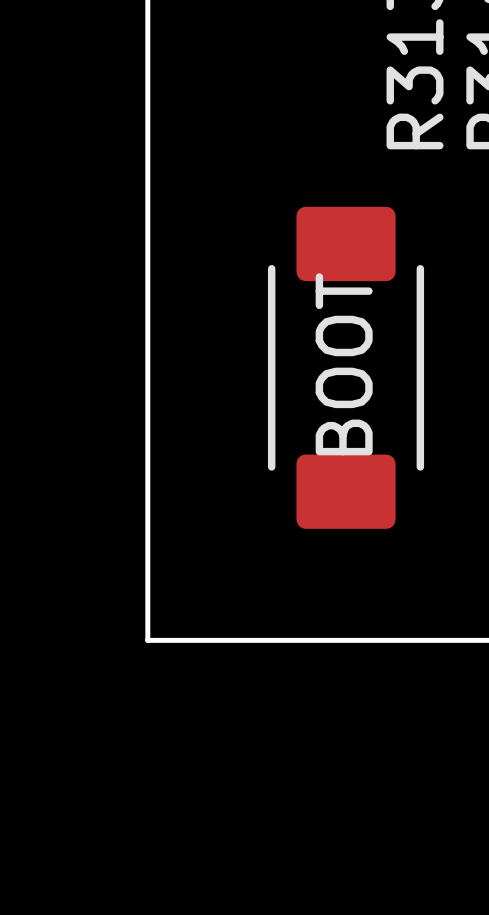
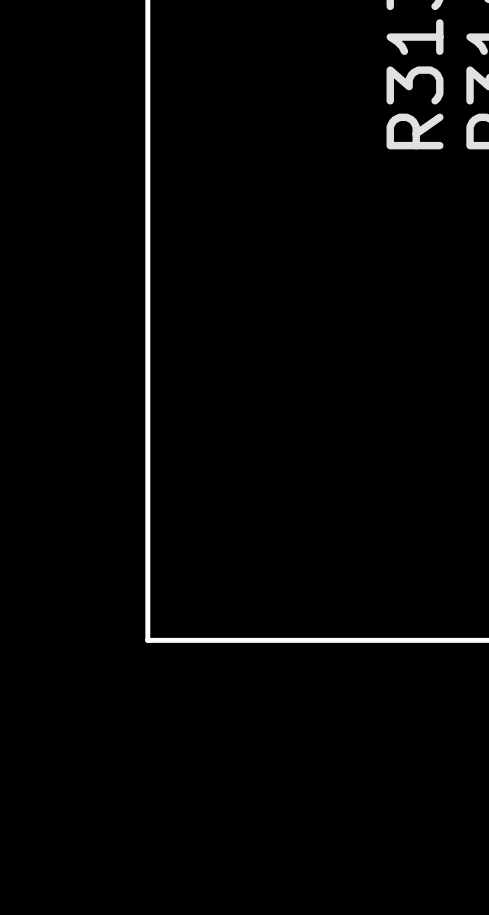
part: BOOT (346, 367) -> none

